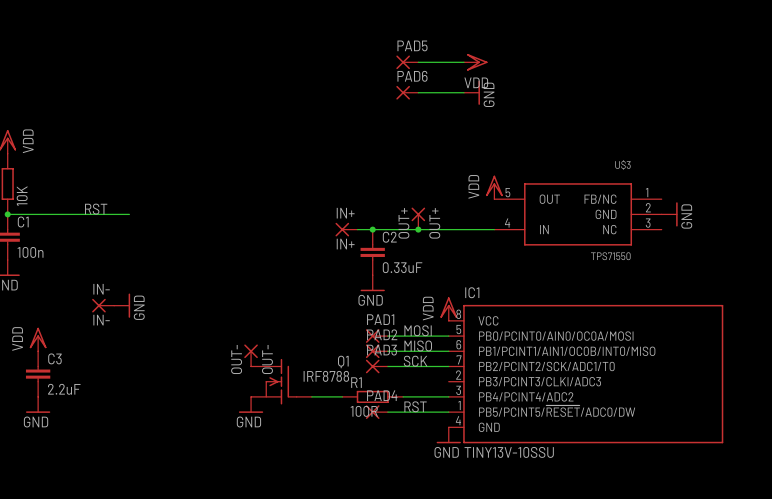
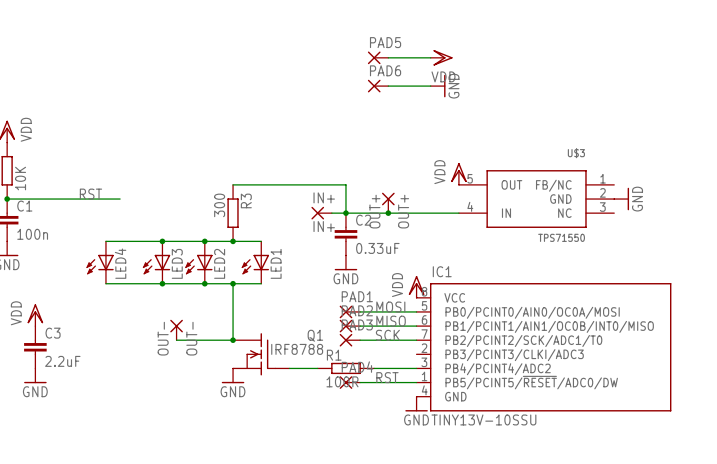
wire: none -> (233, 184) (345, 184) (345, 213)
R3: none -> 300 (233, 213)
wire: none -> (105, 241) (261, 241)
junction: none -> (162, 241)
junction: none -> (204, 241)
junction: none -> (233, 241)
LED4: none -> (100, 262)
LED3: none -> (156, 262)
LED2: none -> (198, 262)
LED1: none -> (255, 262)
IN-: IN- (103, 305) -> none
wire: none -> (105, 283) (261, 283)
power symbol: GND (122, 305) -> none
junction: none -> (162, 283)
junction: none -> (204, 283)
wire: none -> (233, 283) (233, 340) (176, 340)
junction: none -> (233, 283)
OUT- position: (251, 355) -> (176, 329)
junction: none -> (233, 340)

